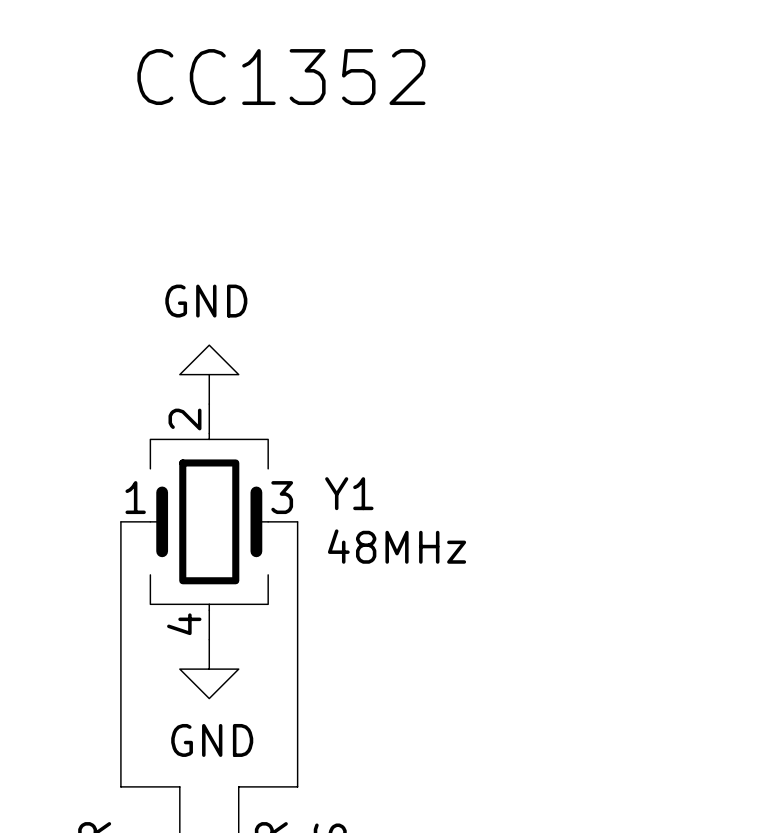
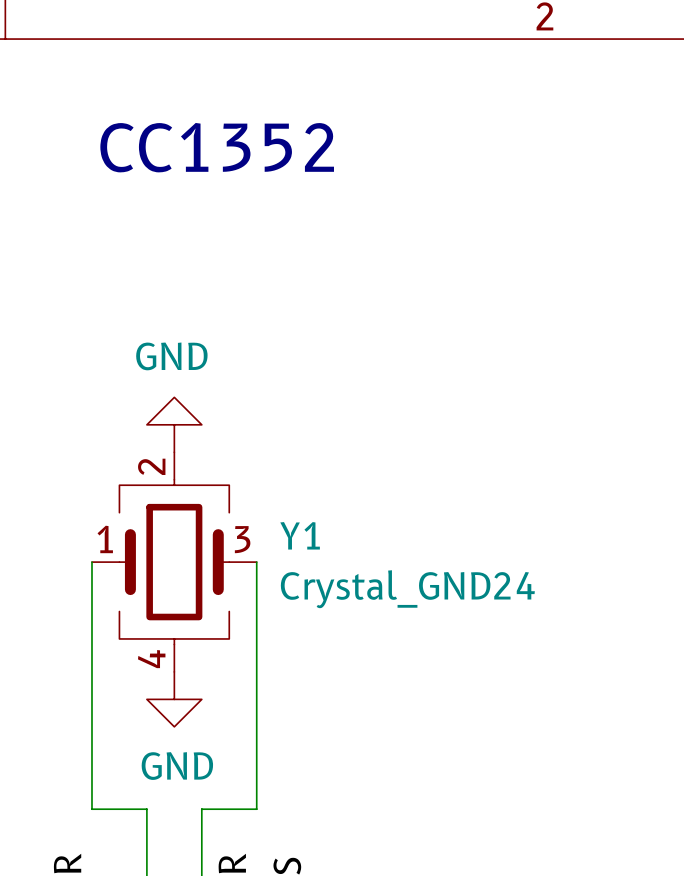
Y1 value: 48MHz (397, 546) -> Crystal_GND24 (407, 589)

